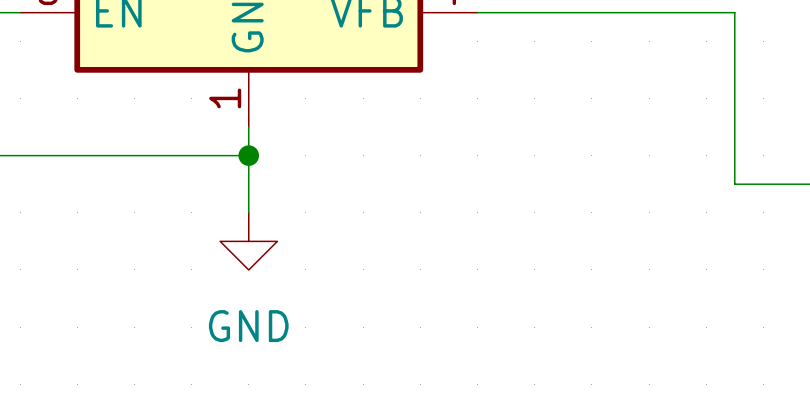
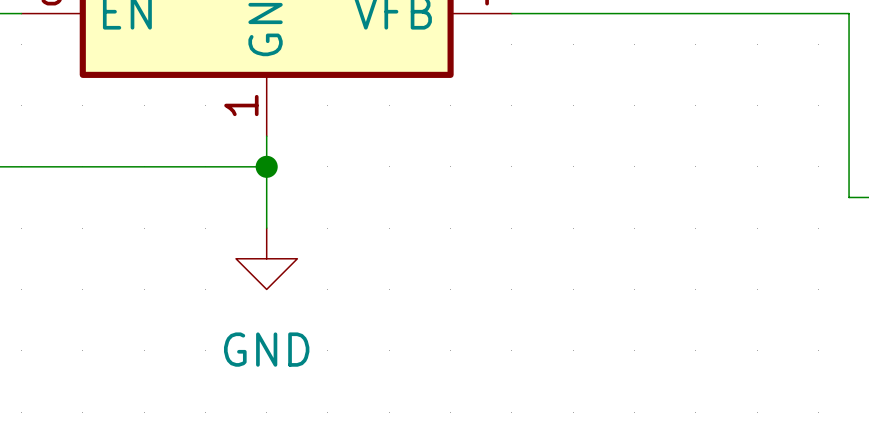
wire: (734, 12) (734, 184) (791, 184) -> (787, 13) (849, 13) (849, 197)

